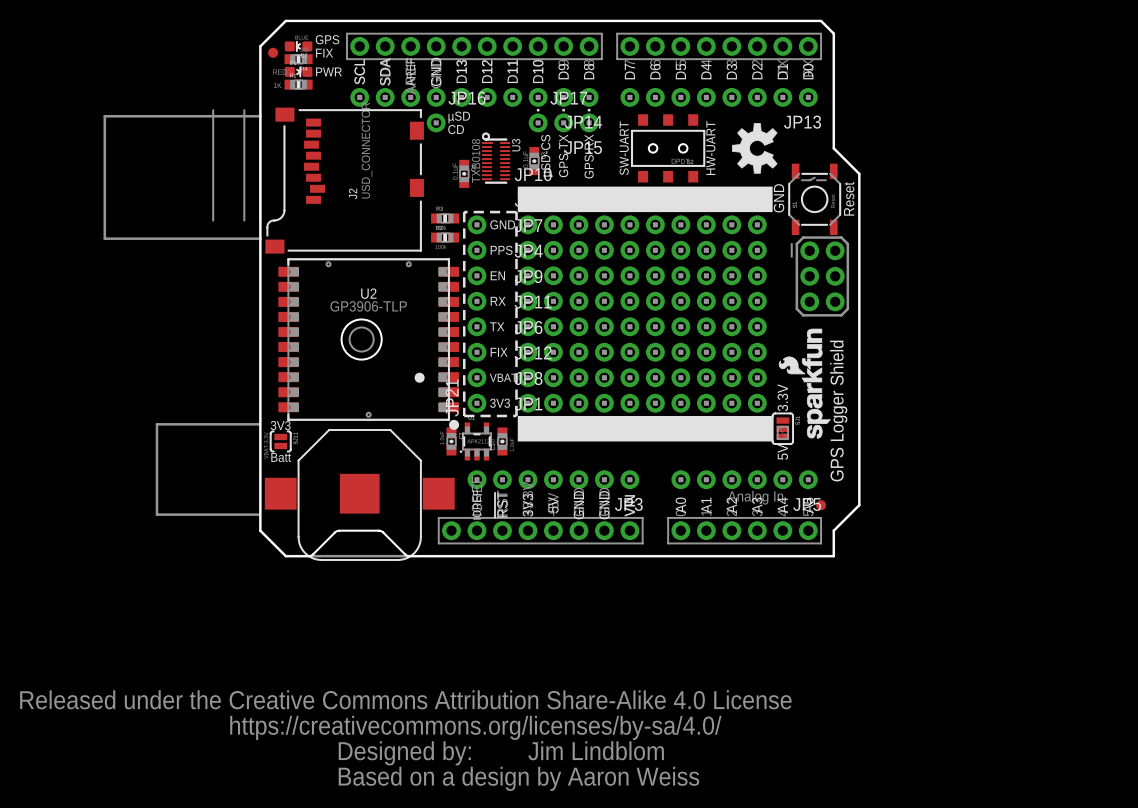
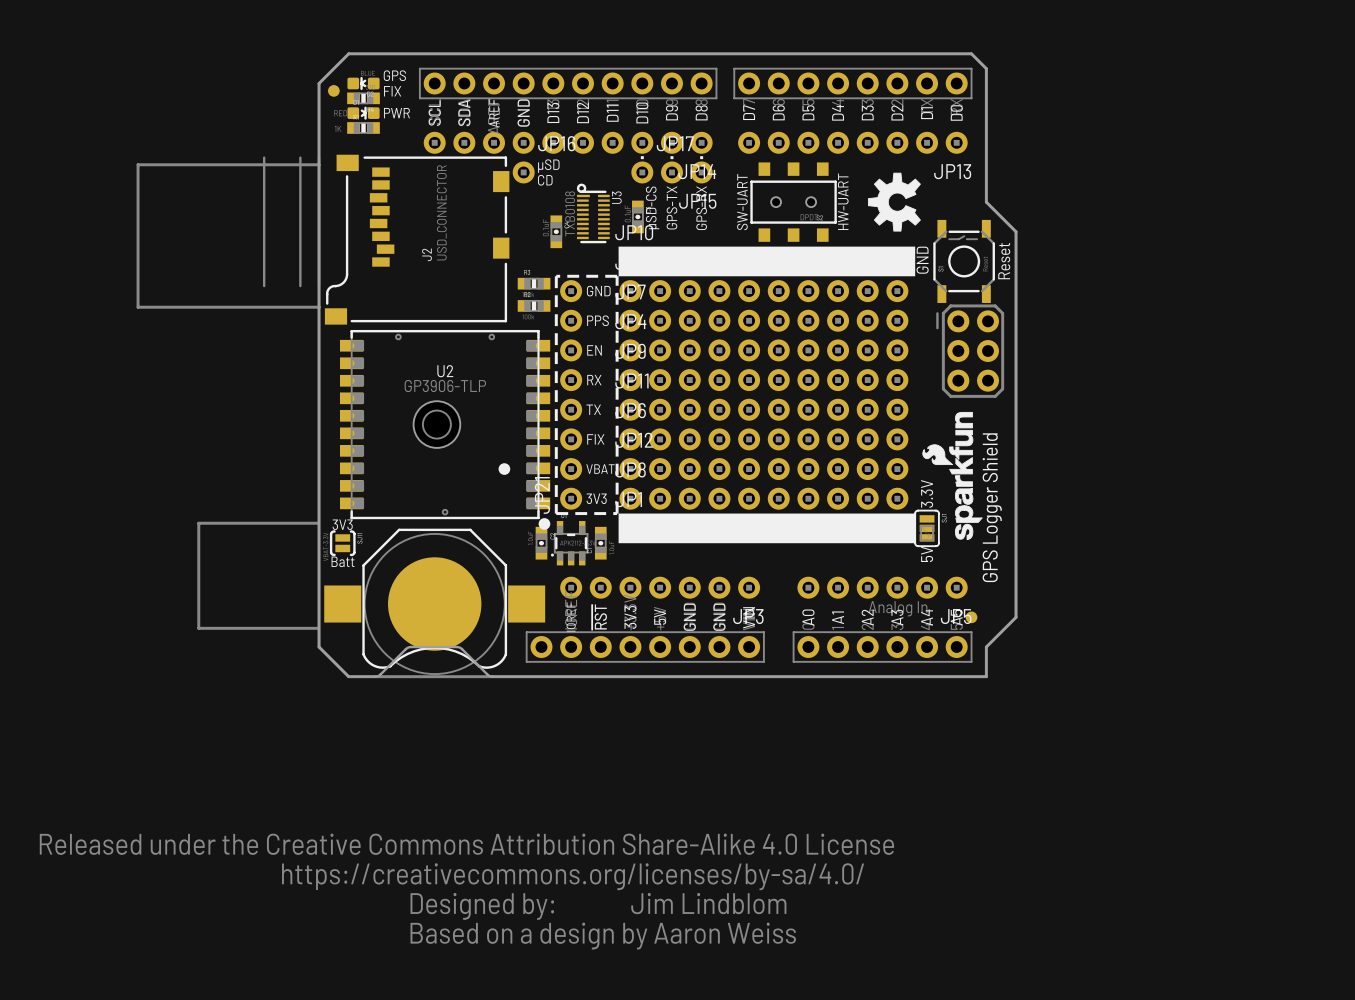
part footprint: [264, 429, 455, 561] -> [324, 528, 546, 675]

